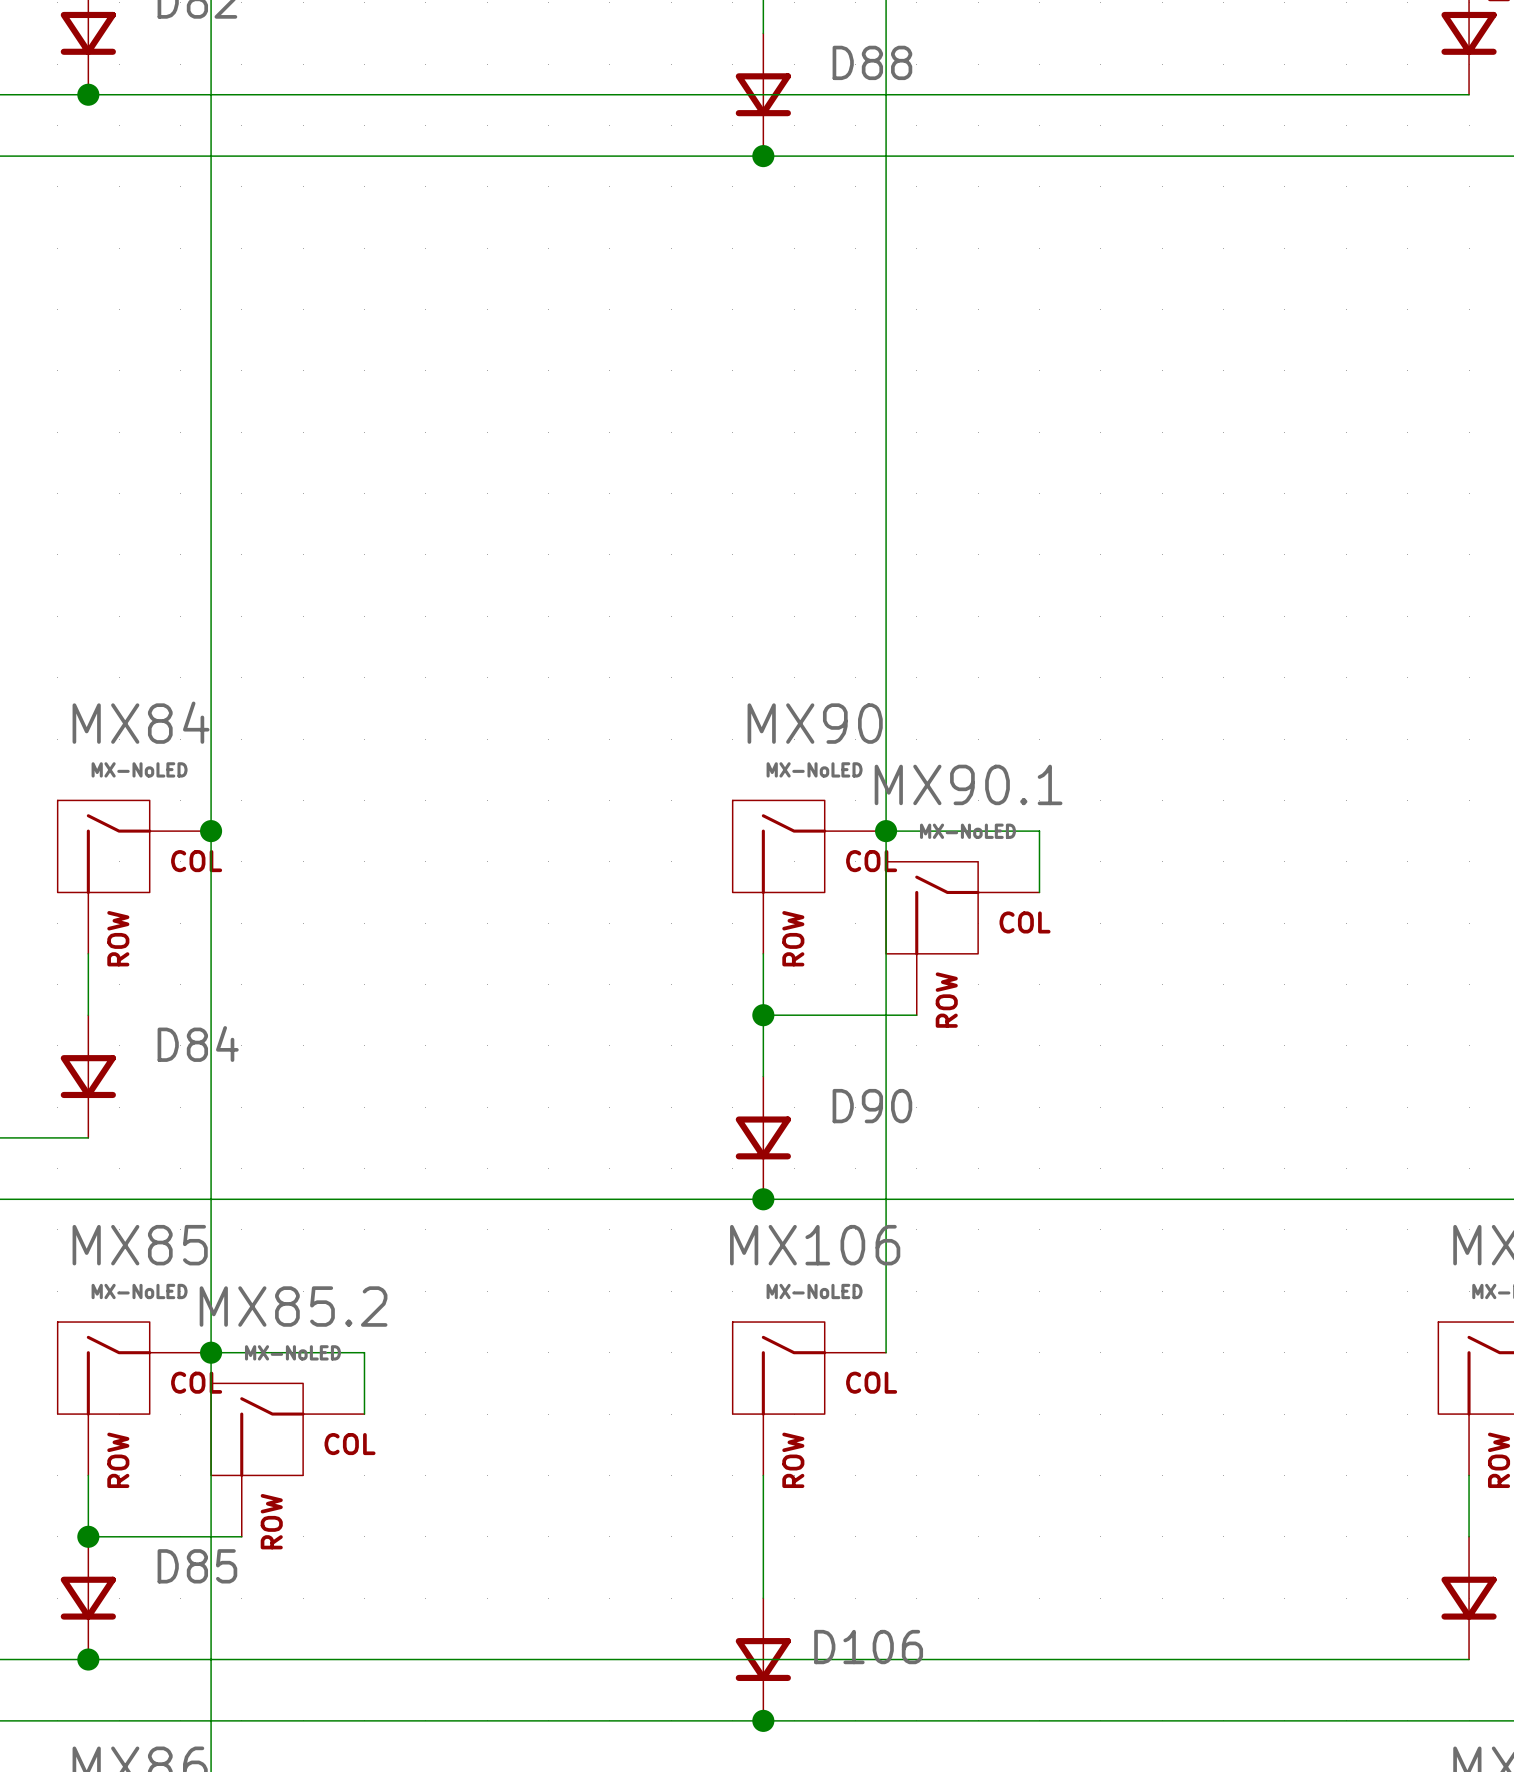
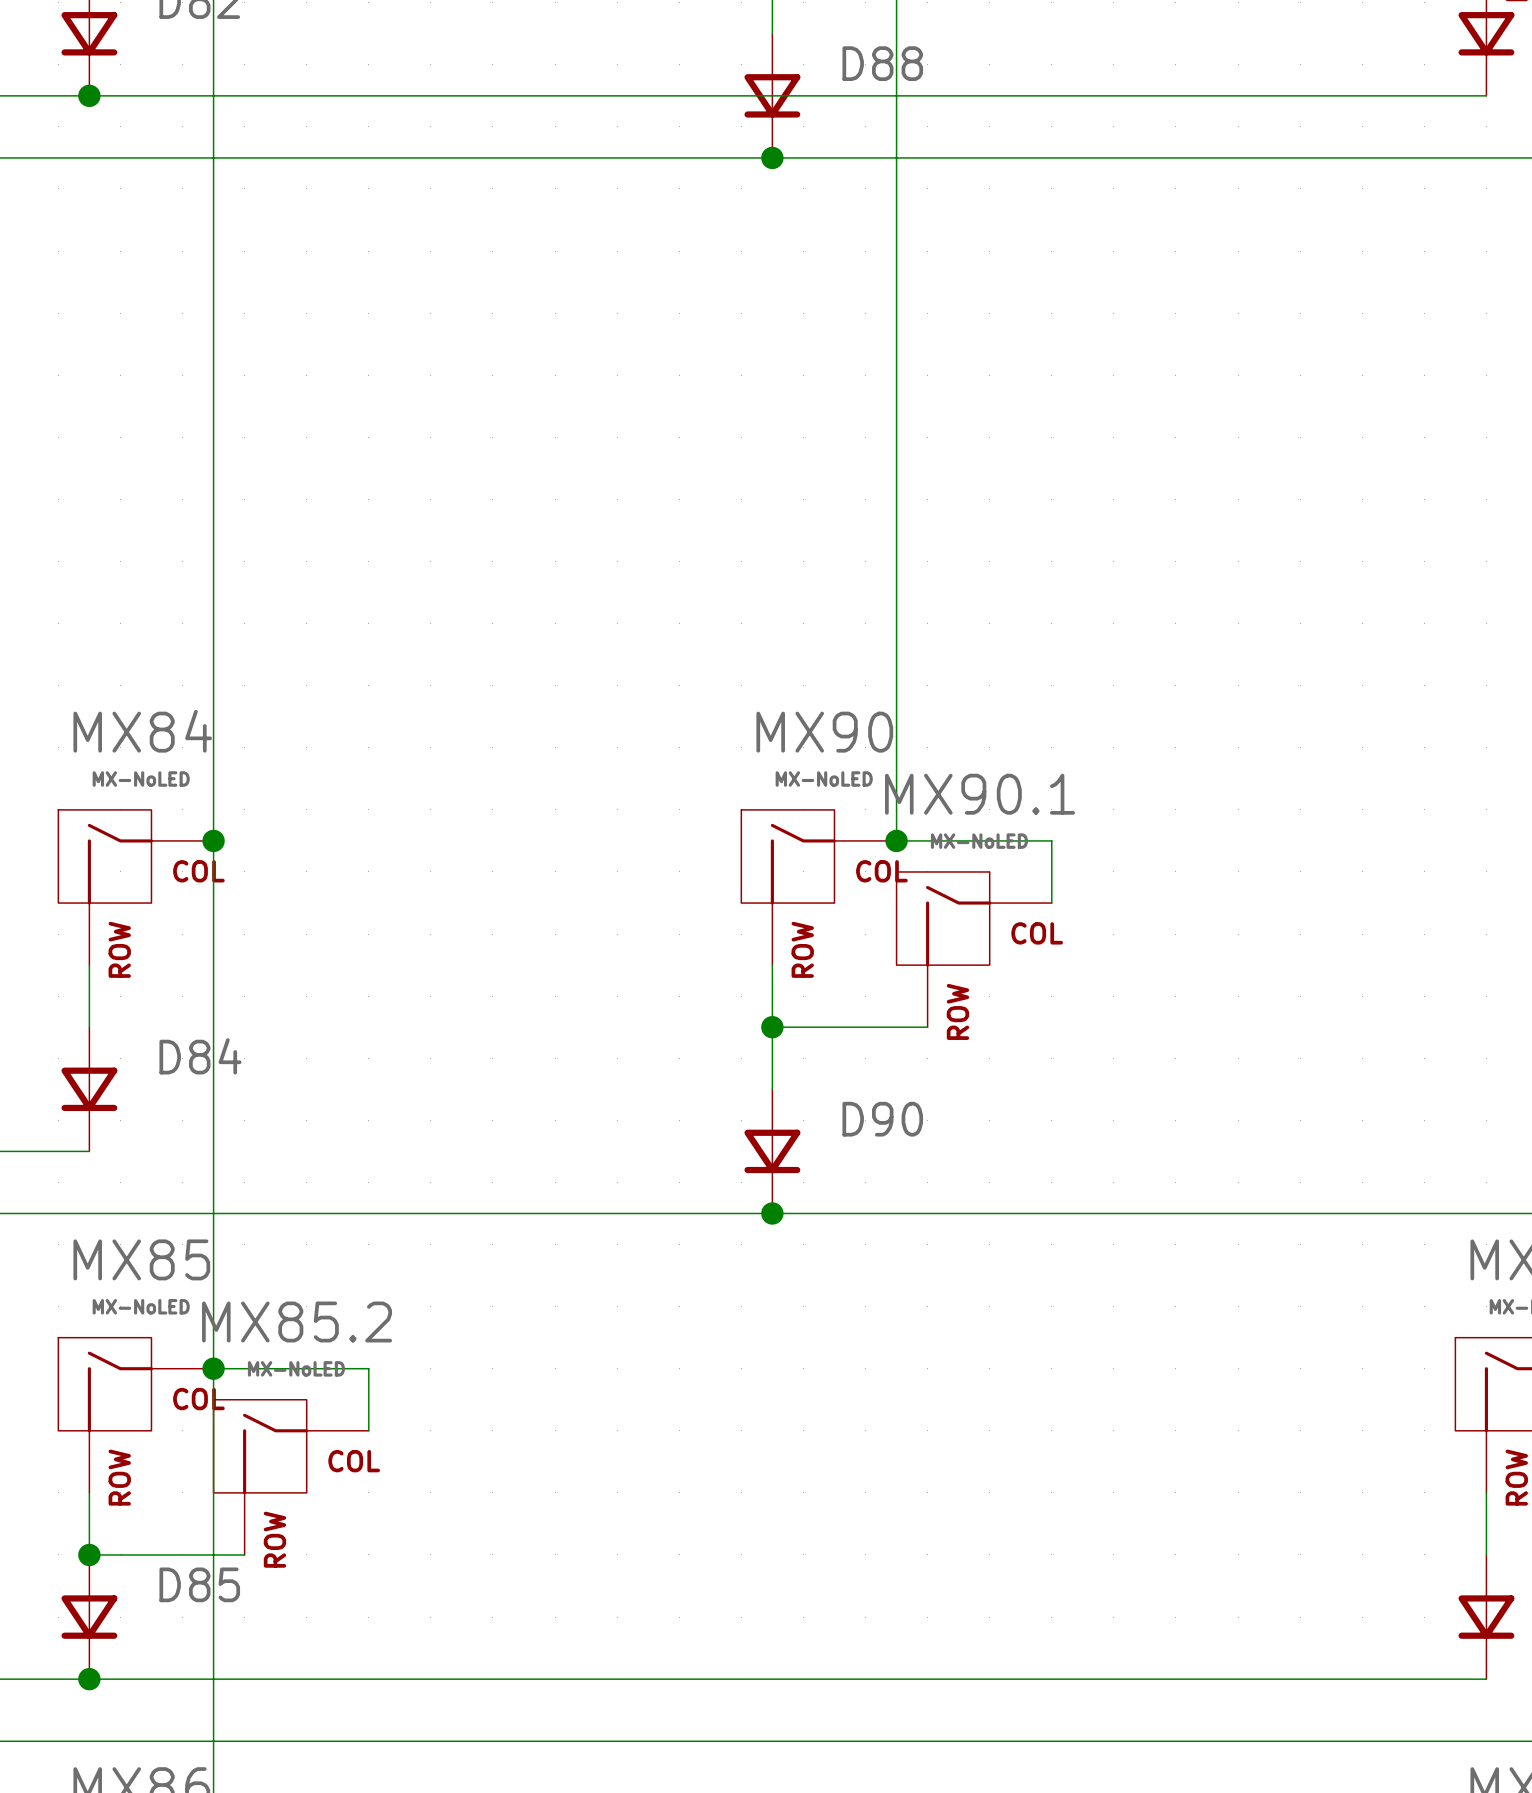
wire: (886, 831) (886, 1352) -> none
MX106: MX-NoLED (809, 1398) -> none
wire: (763, 1475) (763, 1598) -> none
D106: (763, 1659) -> none
junction: (763, 1720) -> none

